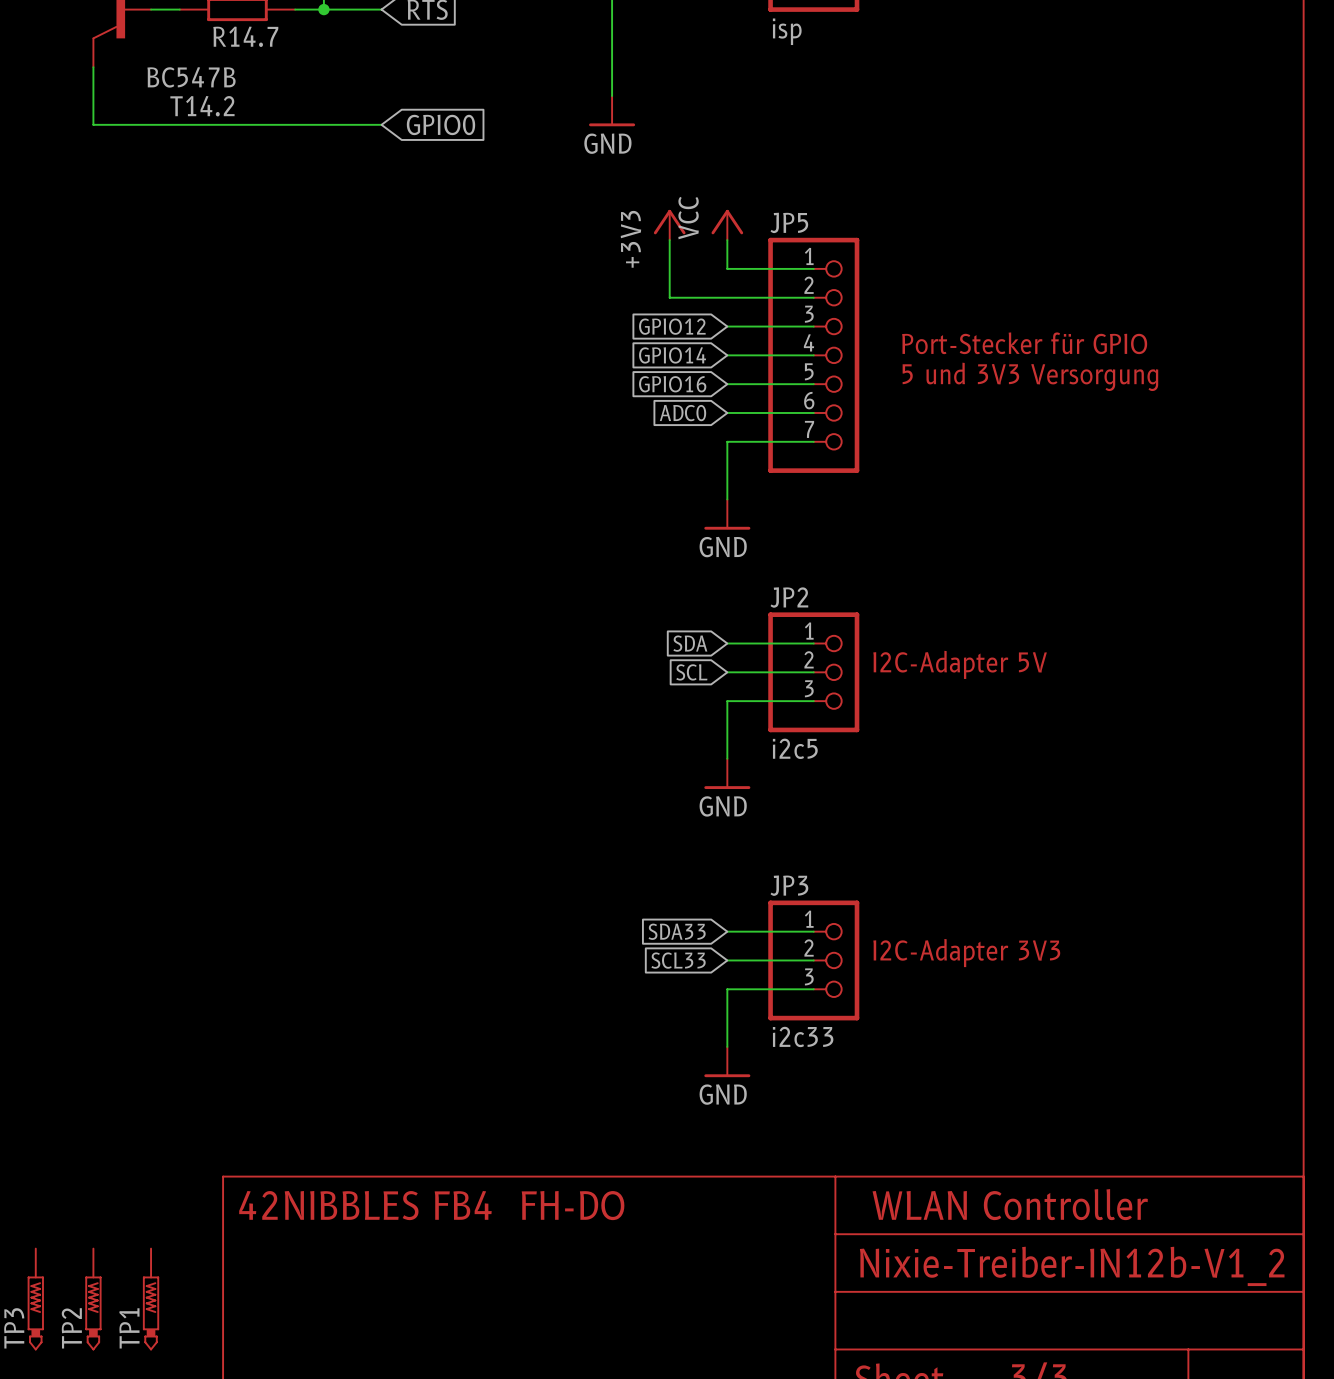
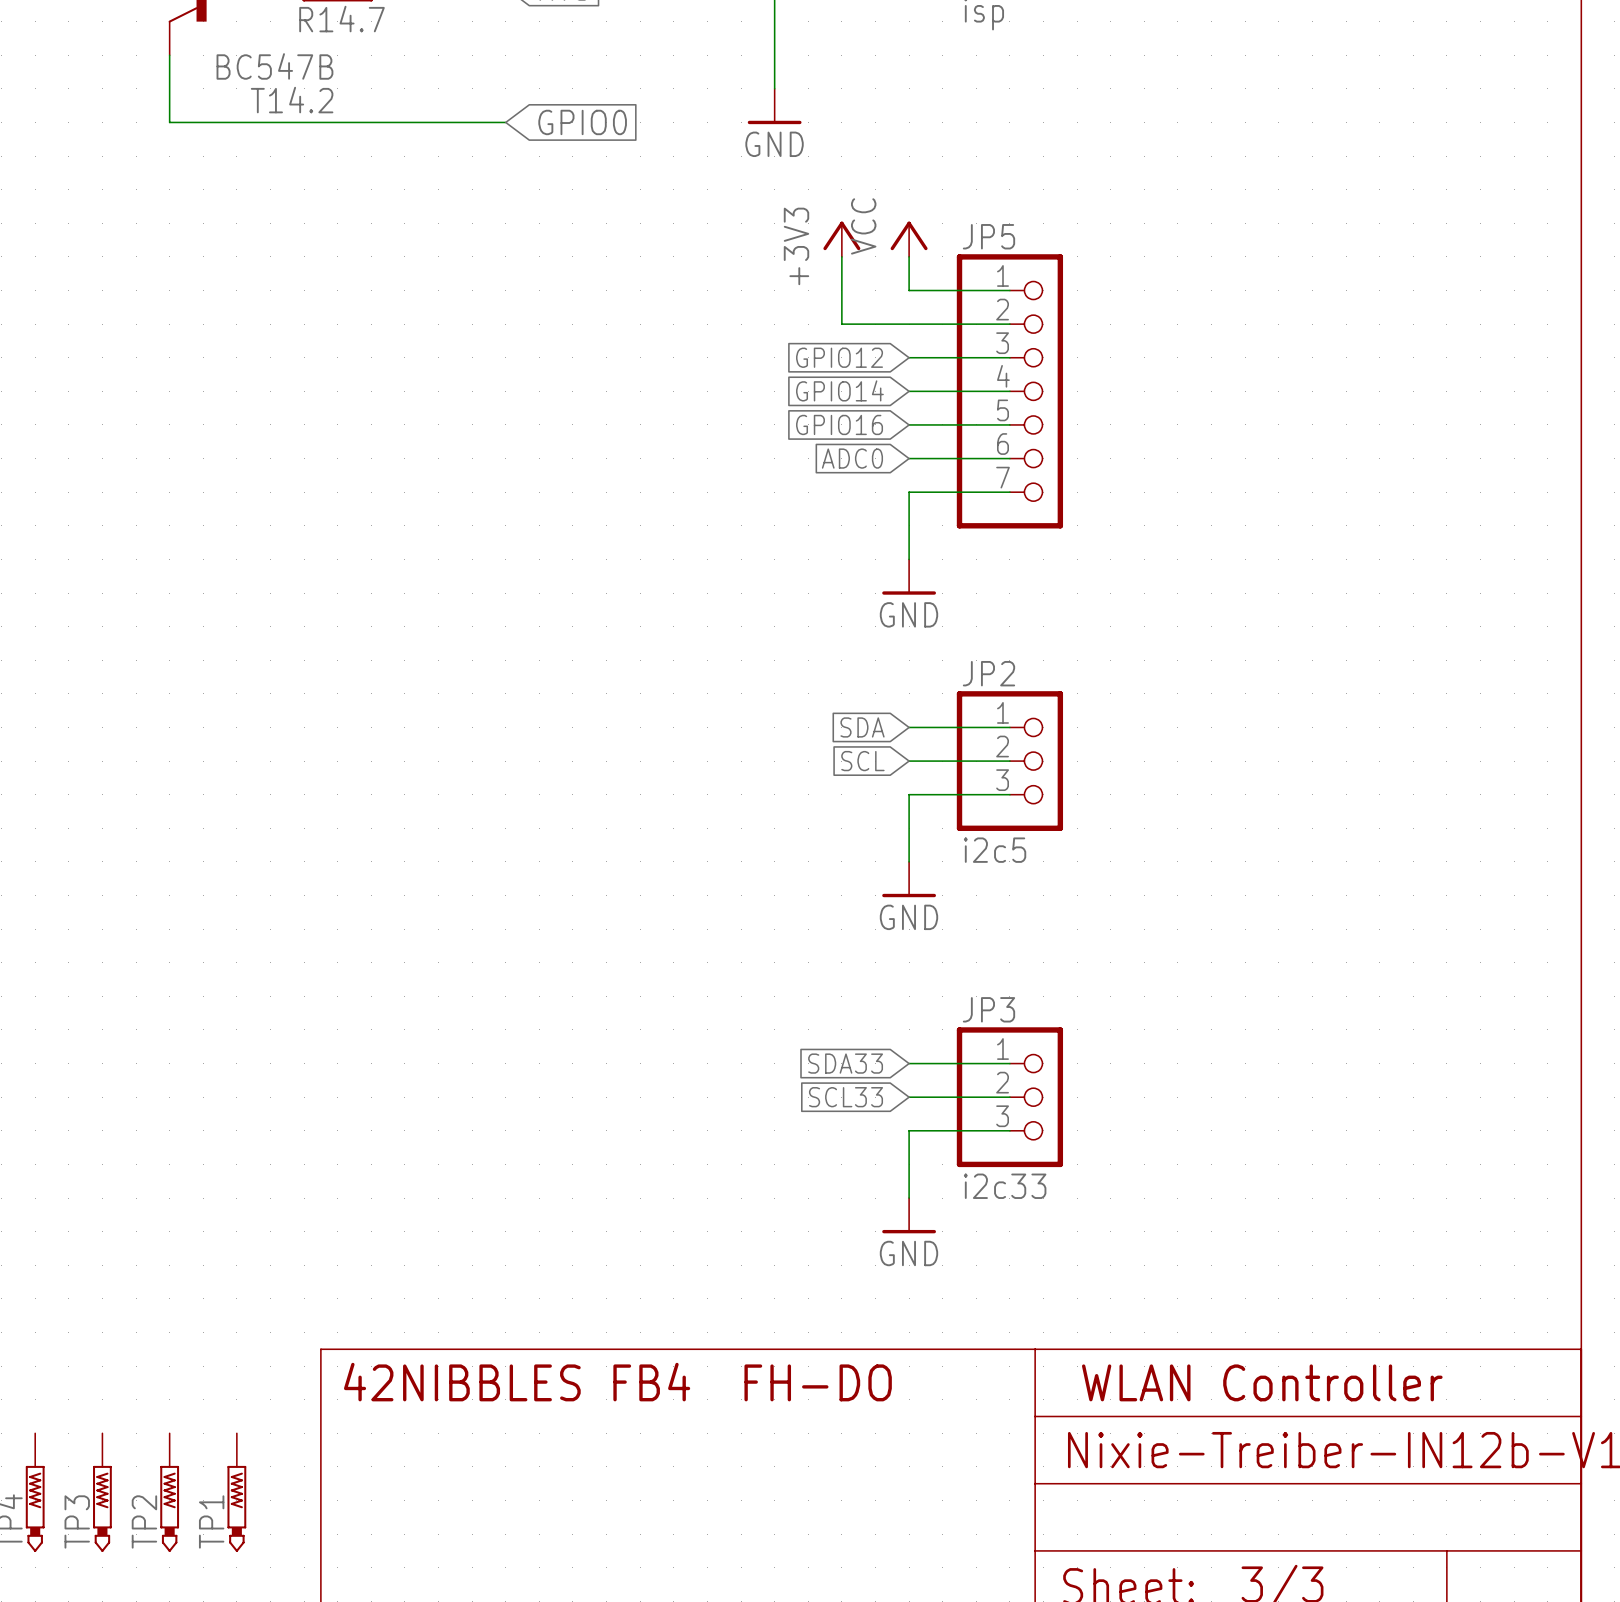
text: Port-Stecker für GPIO (1024, 343) -> none
text: 5 und 3V3 Versorgung (1030, 376) -> none
text: I2C-Adapter 5V (960, 664) -> none
text: I2C-Adapter 3V3 (966, 953) -> none

